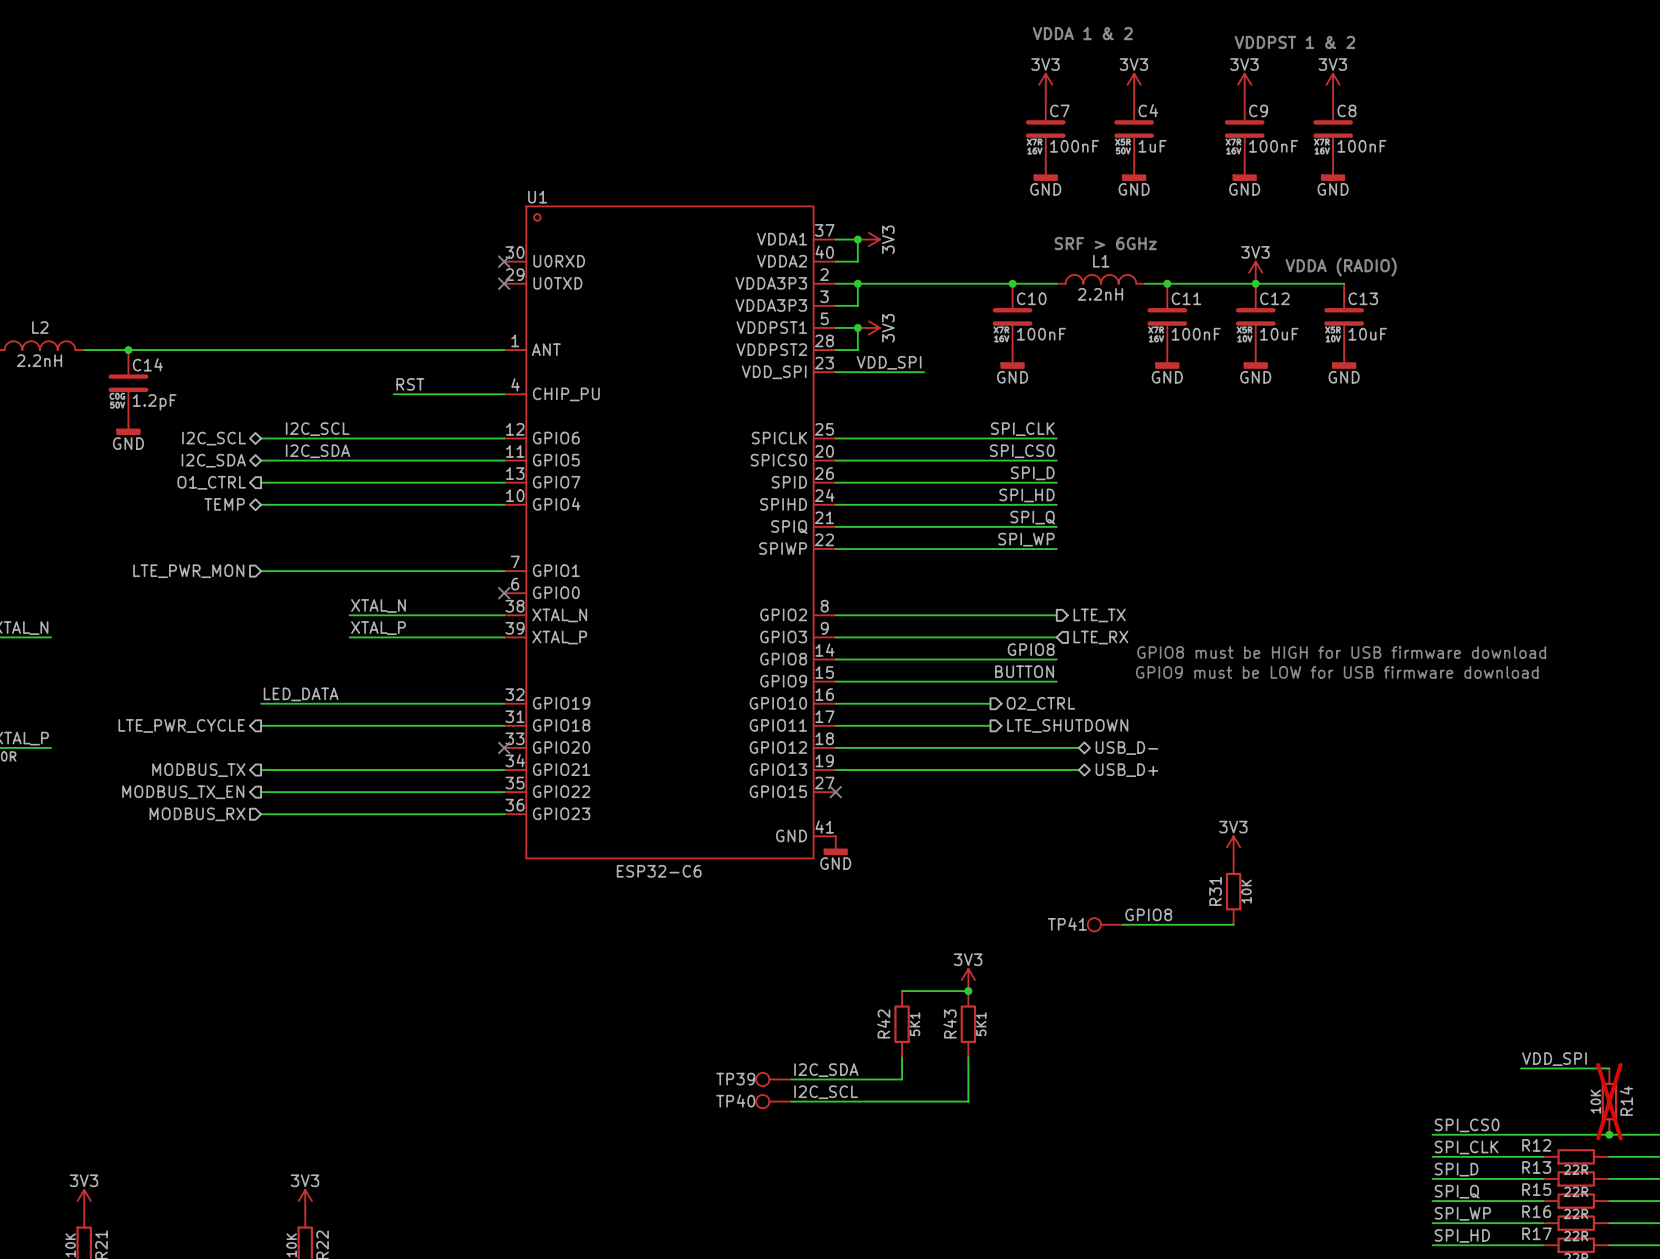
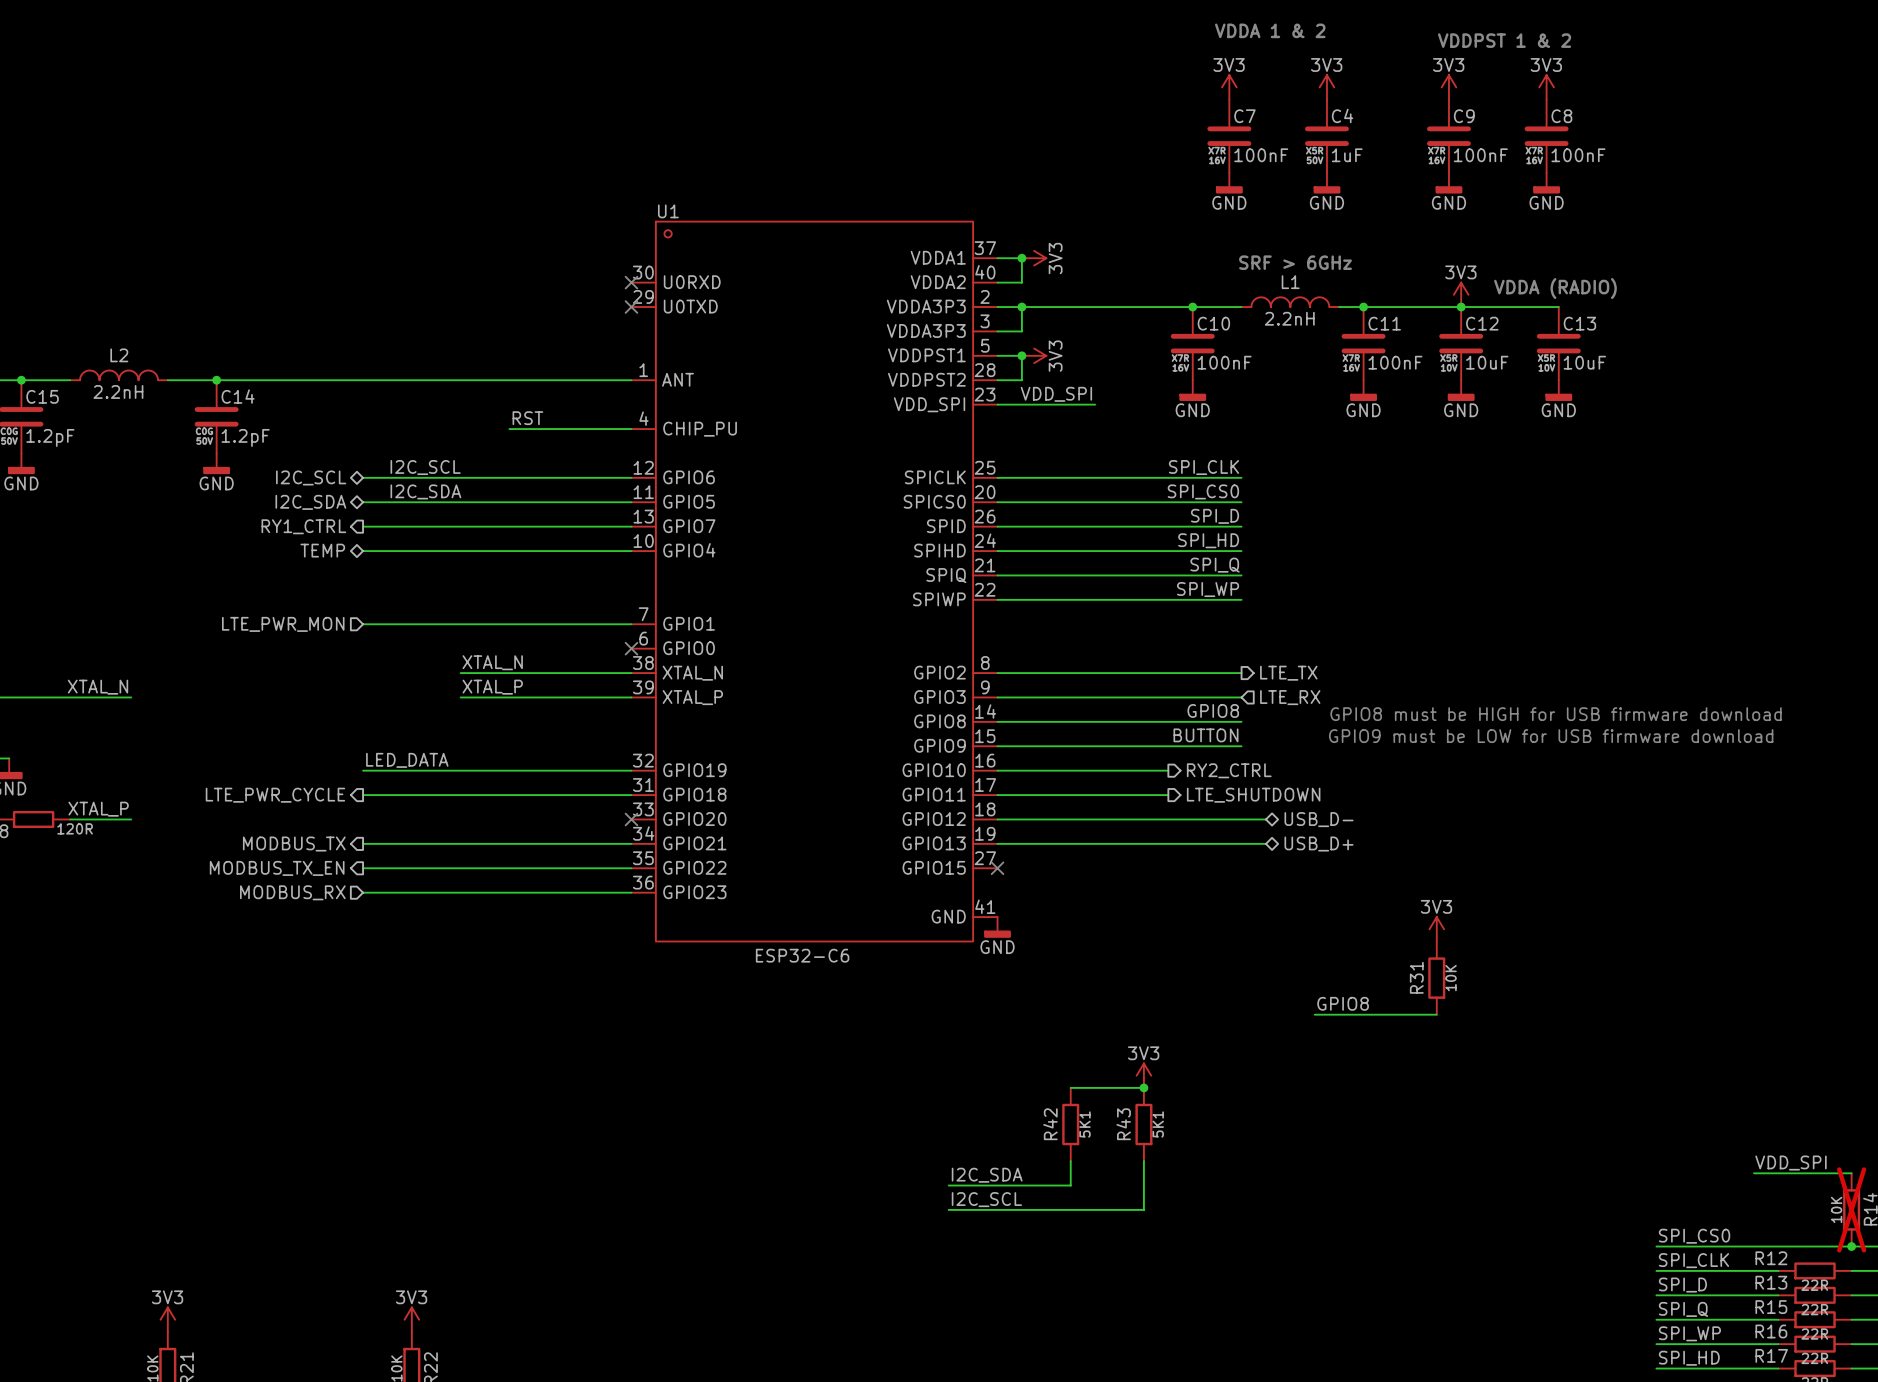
hierarchical label: O1_CTRL (211, 482) -> RY1_CTRL (303, 526)
hierarchical label: O2_CTRL (1040, 703) -> RY2_CTRL (1229, 770)
TP41: (1105, 924) -> none
TP39: (773, 1079) -> none
TP40: (773, 1101) -> none

